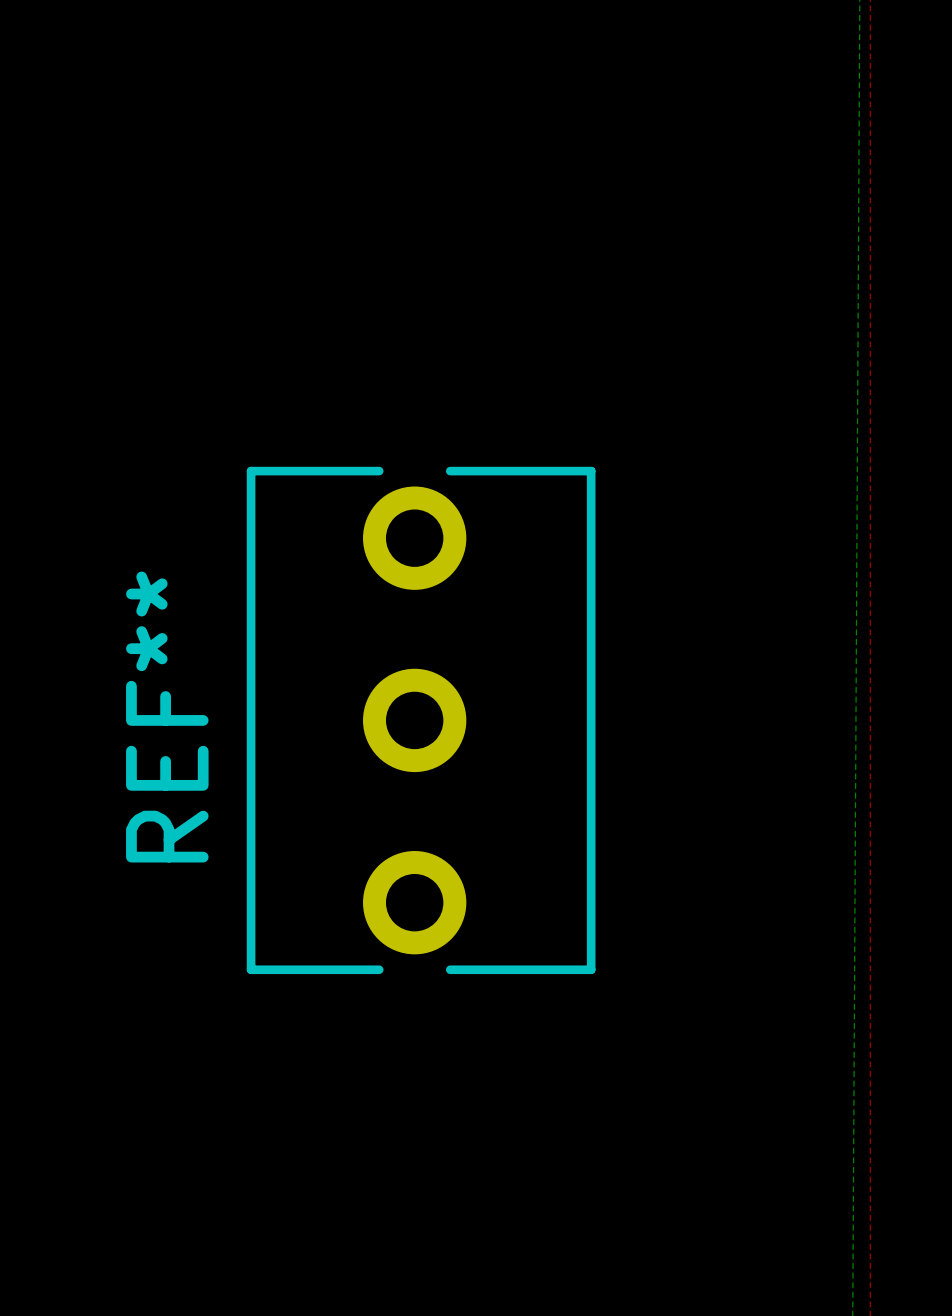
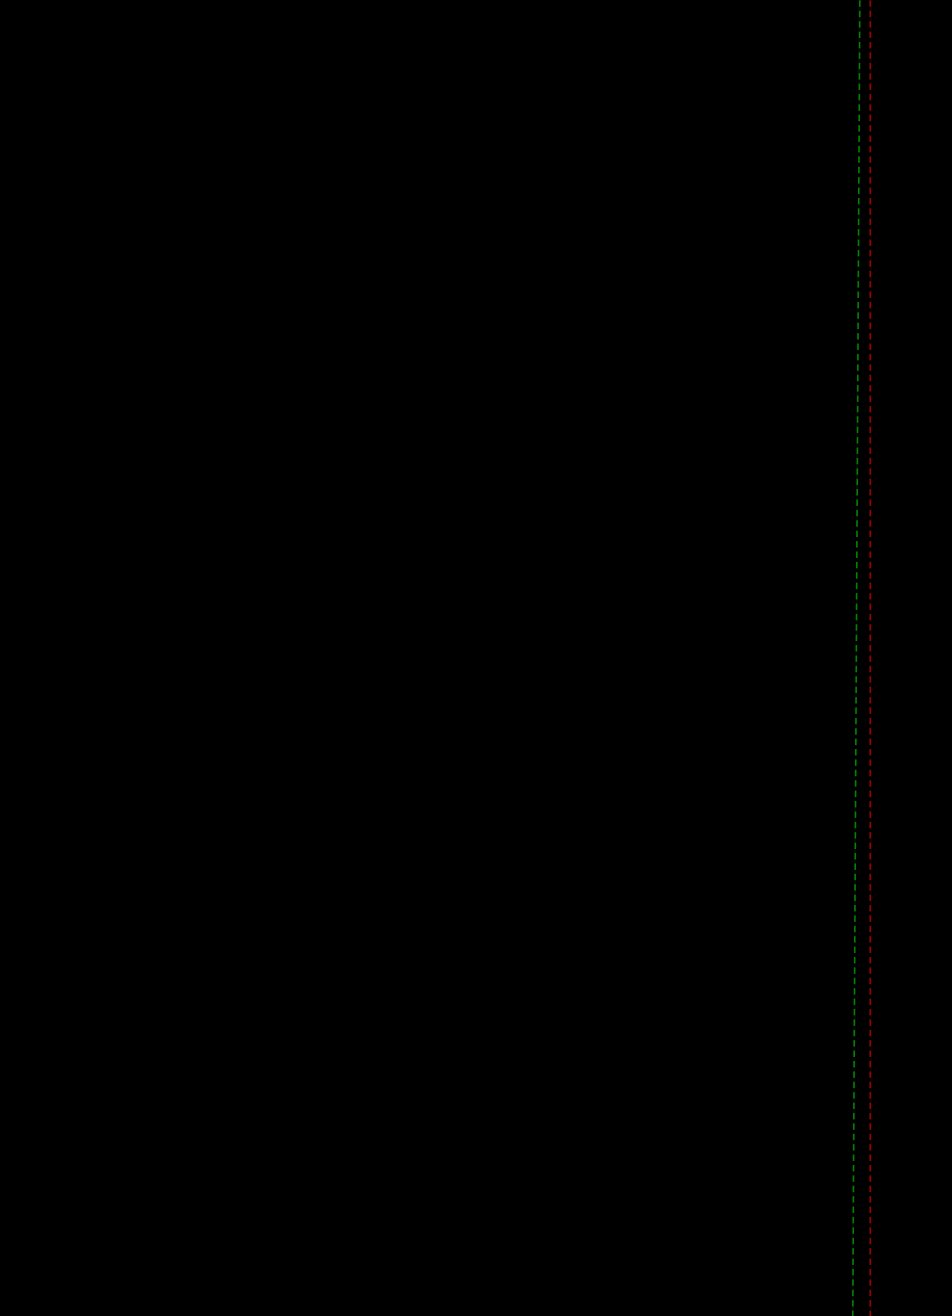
REF**: (421, 720) -> none

